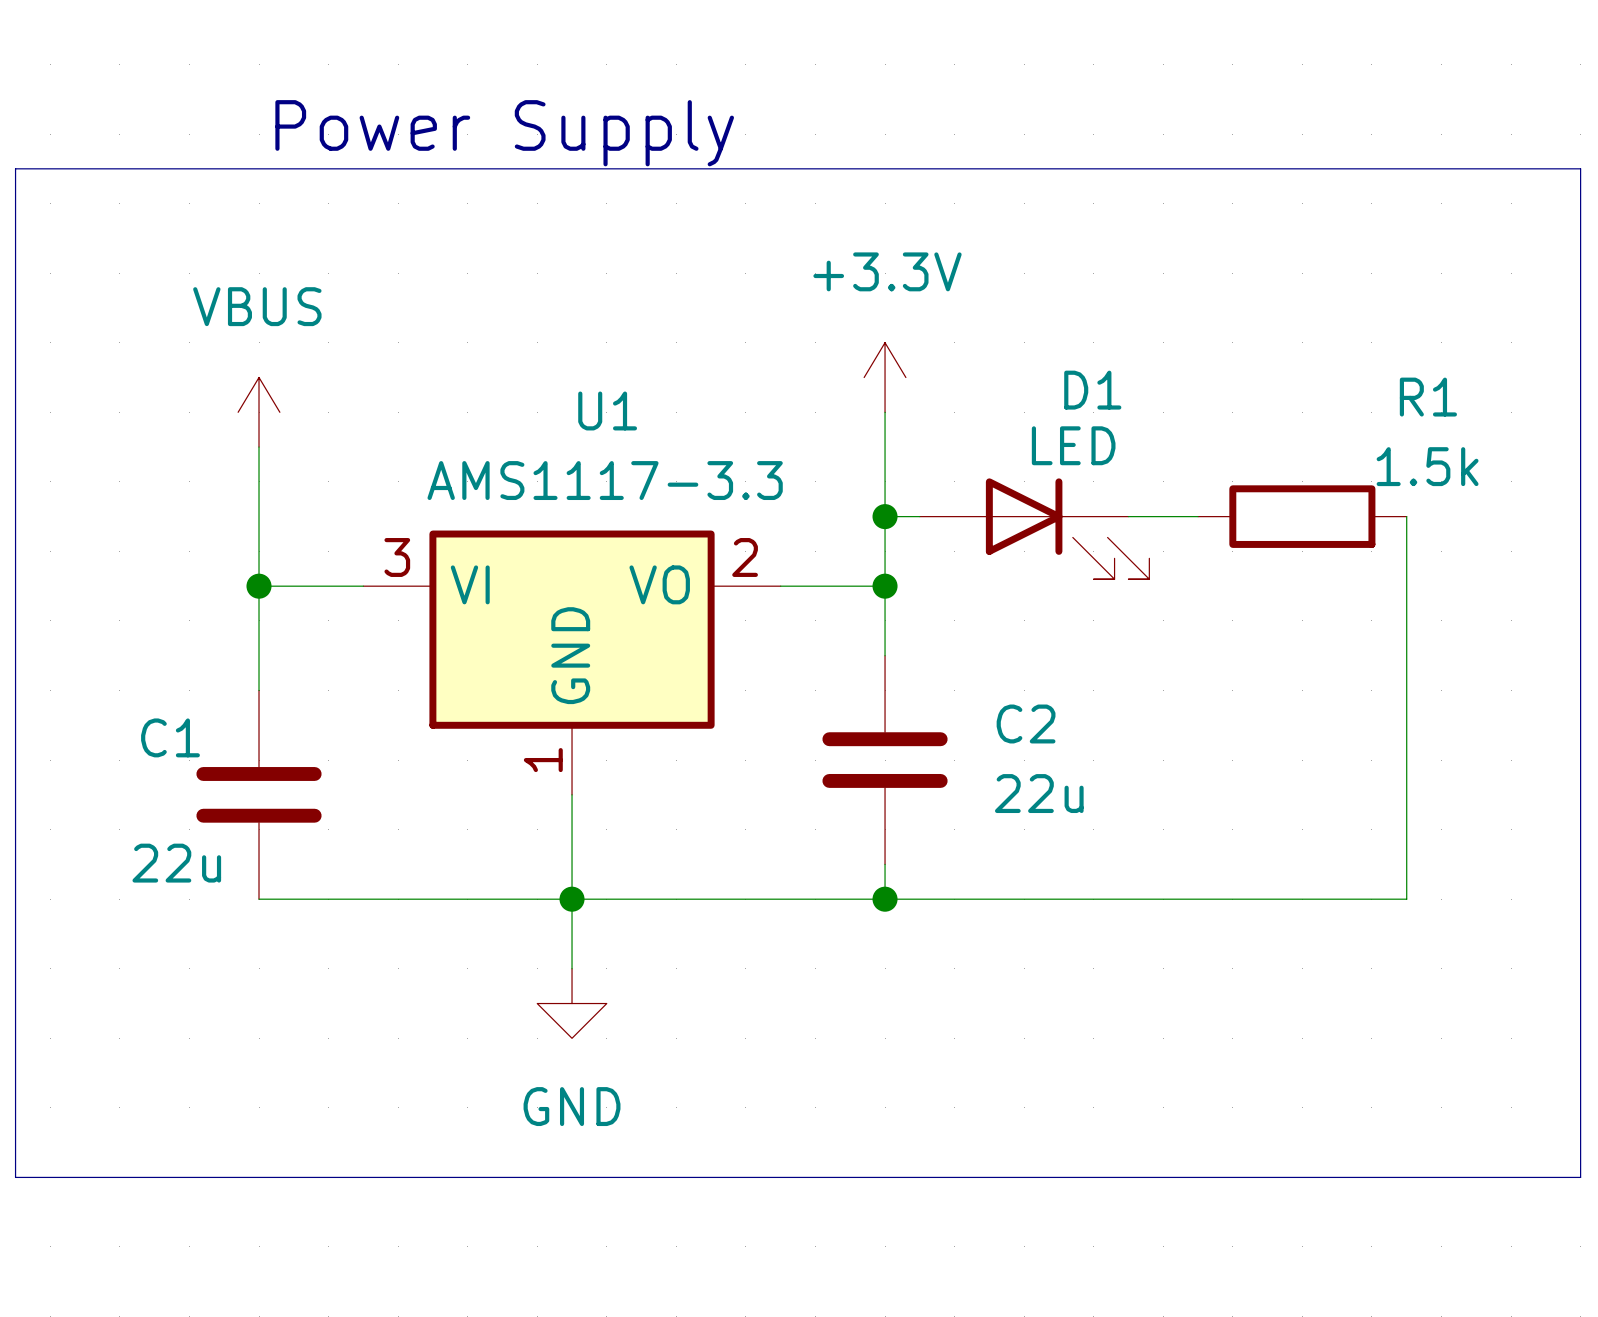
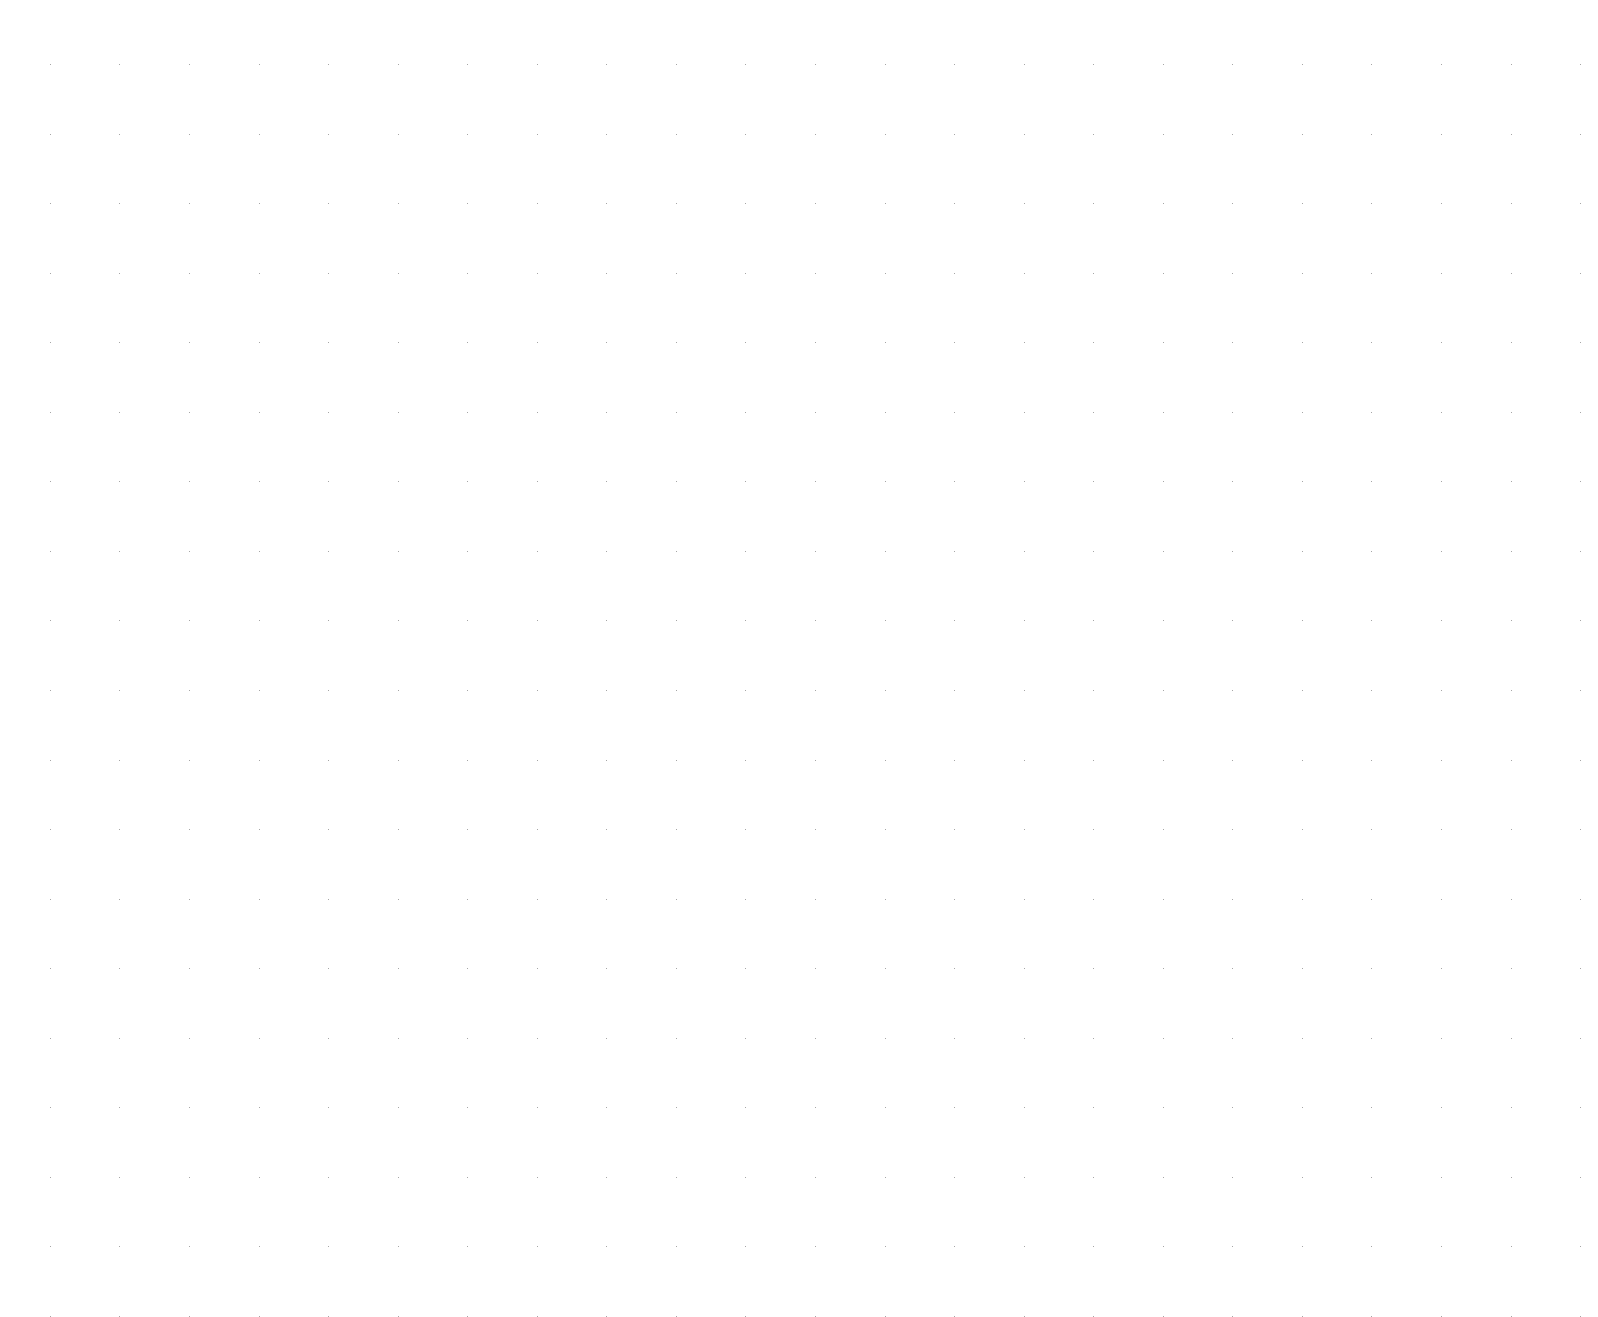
text: Power Supply (504, 133) -> none
line: (15, 168) (15, 1177) (1580, 1177) (1580, 168) (15, 168) -> none
power symbol: +3.3V (885, 377) -> none
power symbol: VBUS (259, 412) -> none
wire: (885, 412) (885, 655) -> none
wire: (259, 447) (259, 690) -> none
wire: (885, 516) (919, 516) -> none
junction: (885, 516) -> none
wire: (1128, 516) (1198, 516) -> none
R1: 1.5k (1302, 516) -> none
wire: (1406, 516) (1406, 899) (259, 899) -> none
D1: LED (1034, 528) -> none
wire: (259, 586) (363, 586) -> none
junction: (259, 586) -> none
wire: (780, 586) (885, 586) -> none
junction: (885, 586) -> none
U1: AMS1117-3.3 (572, 662) -> none
C2: 22u (885, 760) -> none
C1: 22u (259, 794) -> none
wire: (572, 794) (572, 968) -> none
wire: (885, 864) (885, 899) -> none
junction: (572, 899) -> none
junction: (885, 899) -> none
power symbol: GND (572, 1003) -> none

